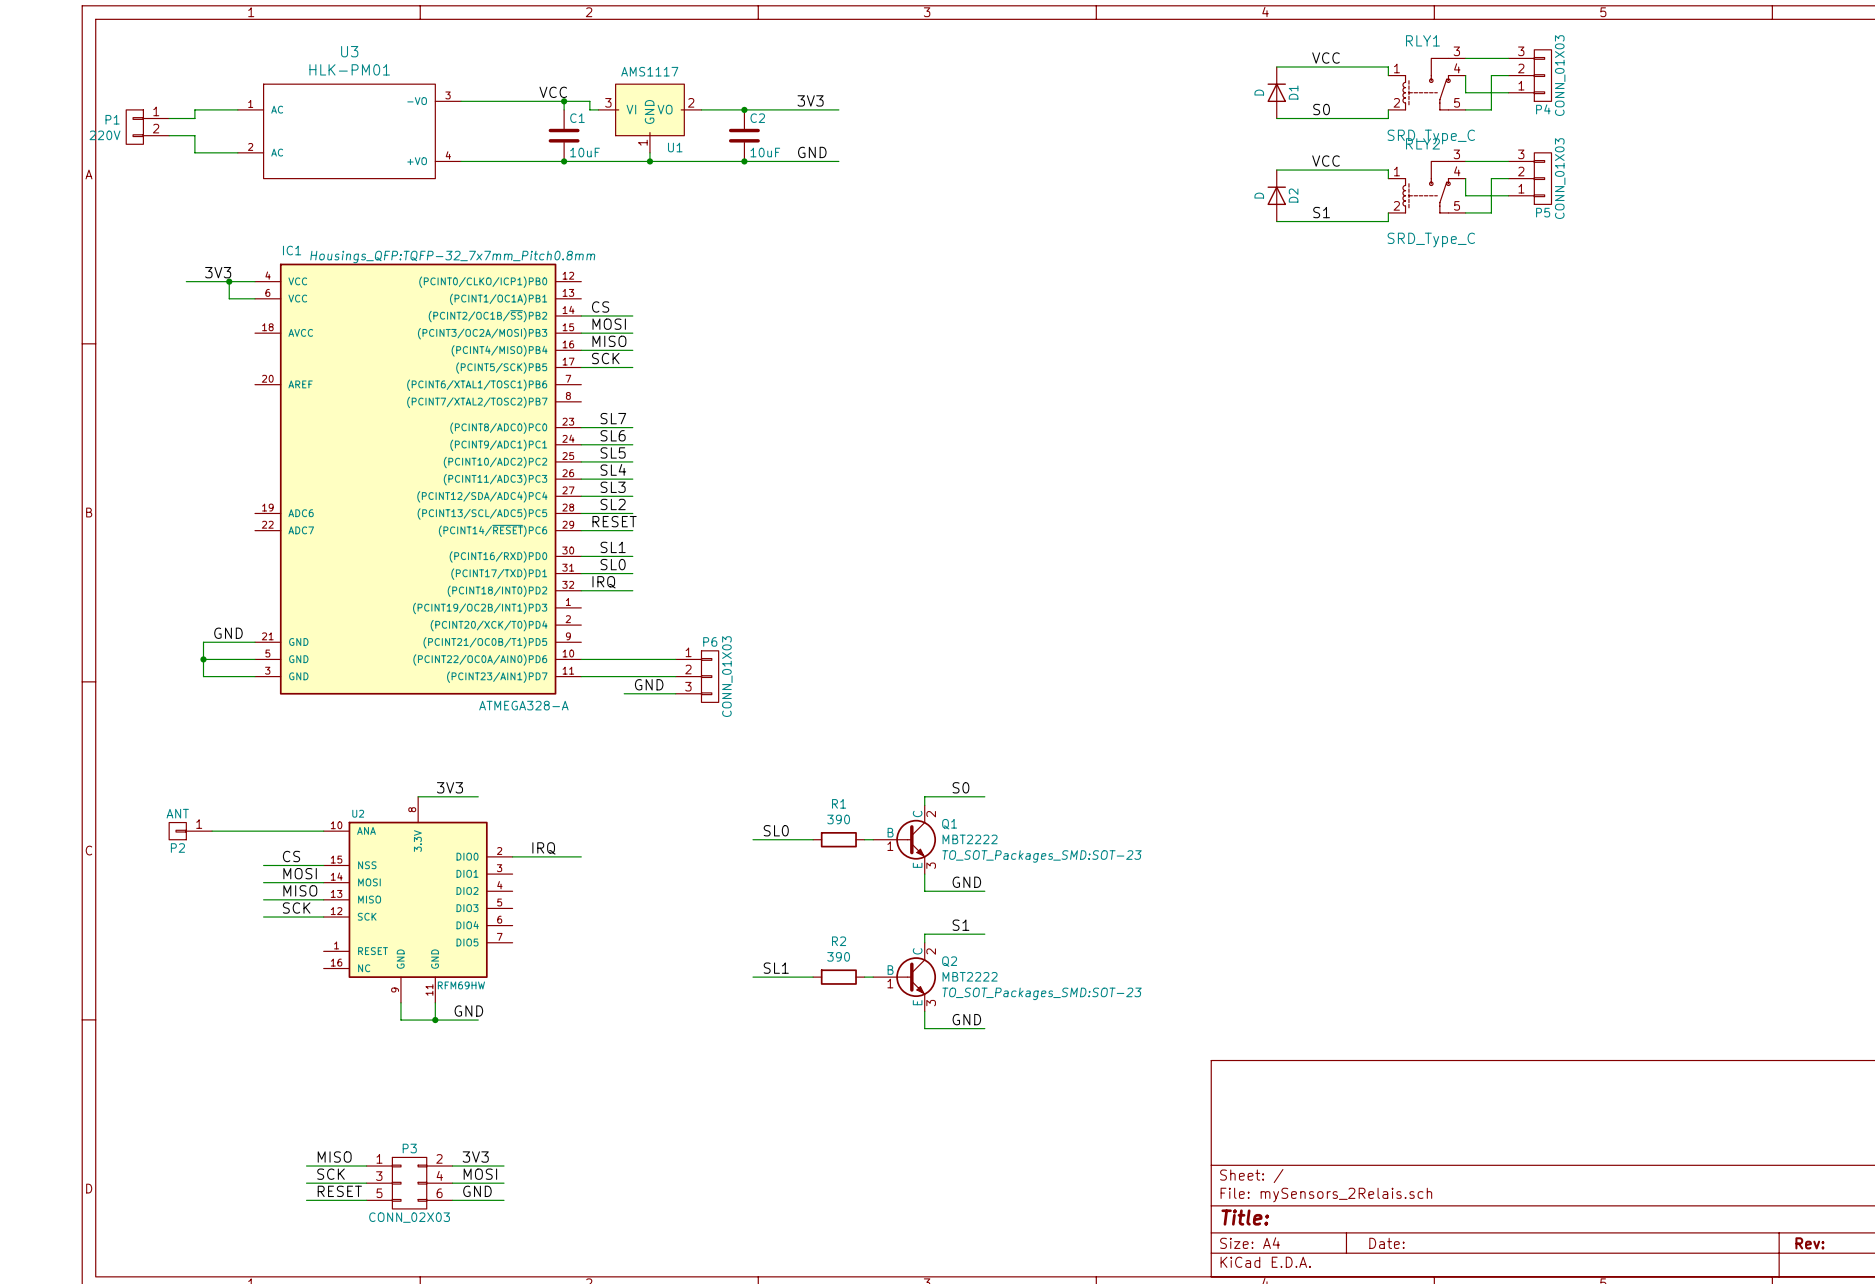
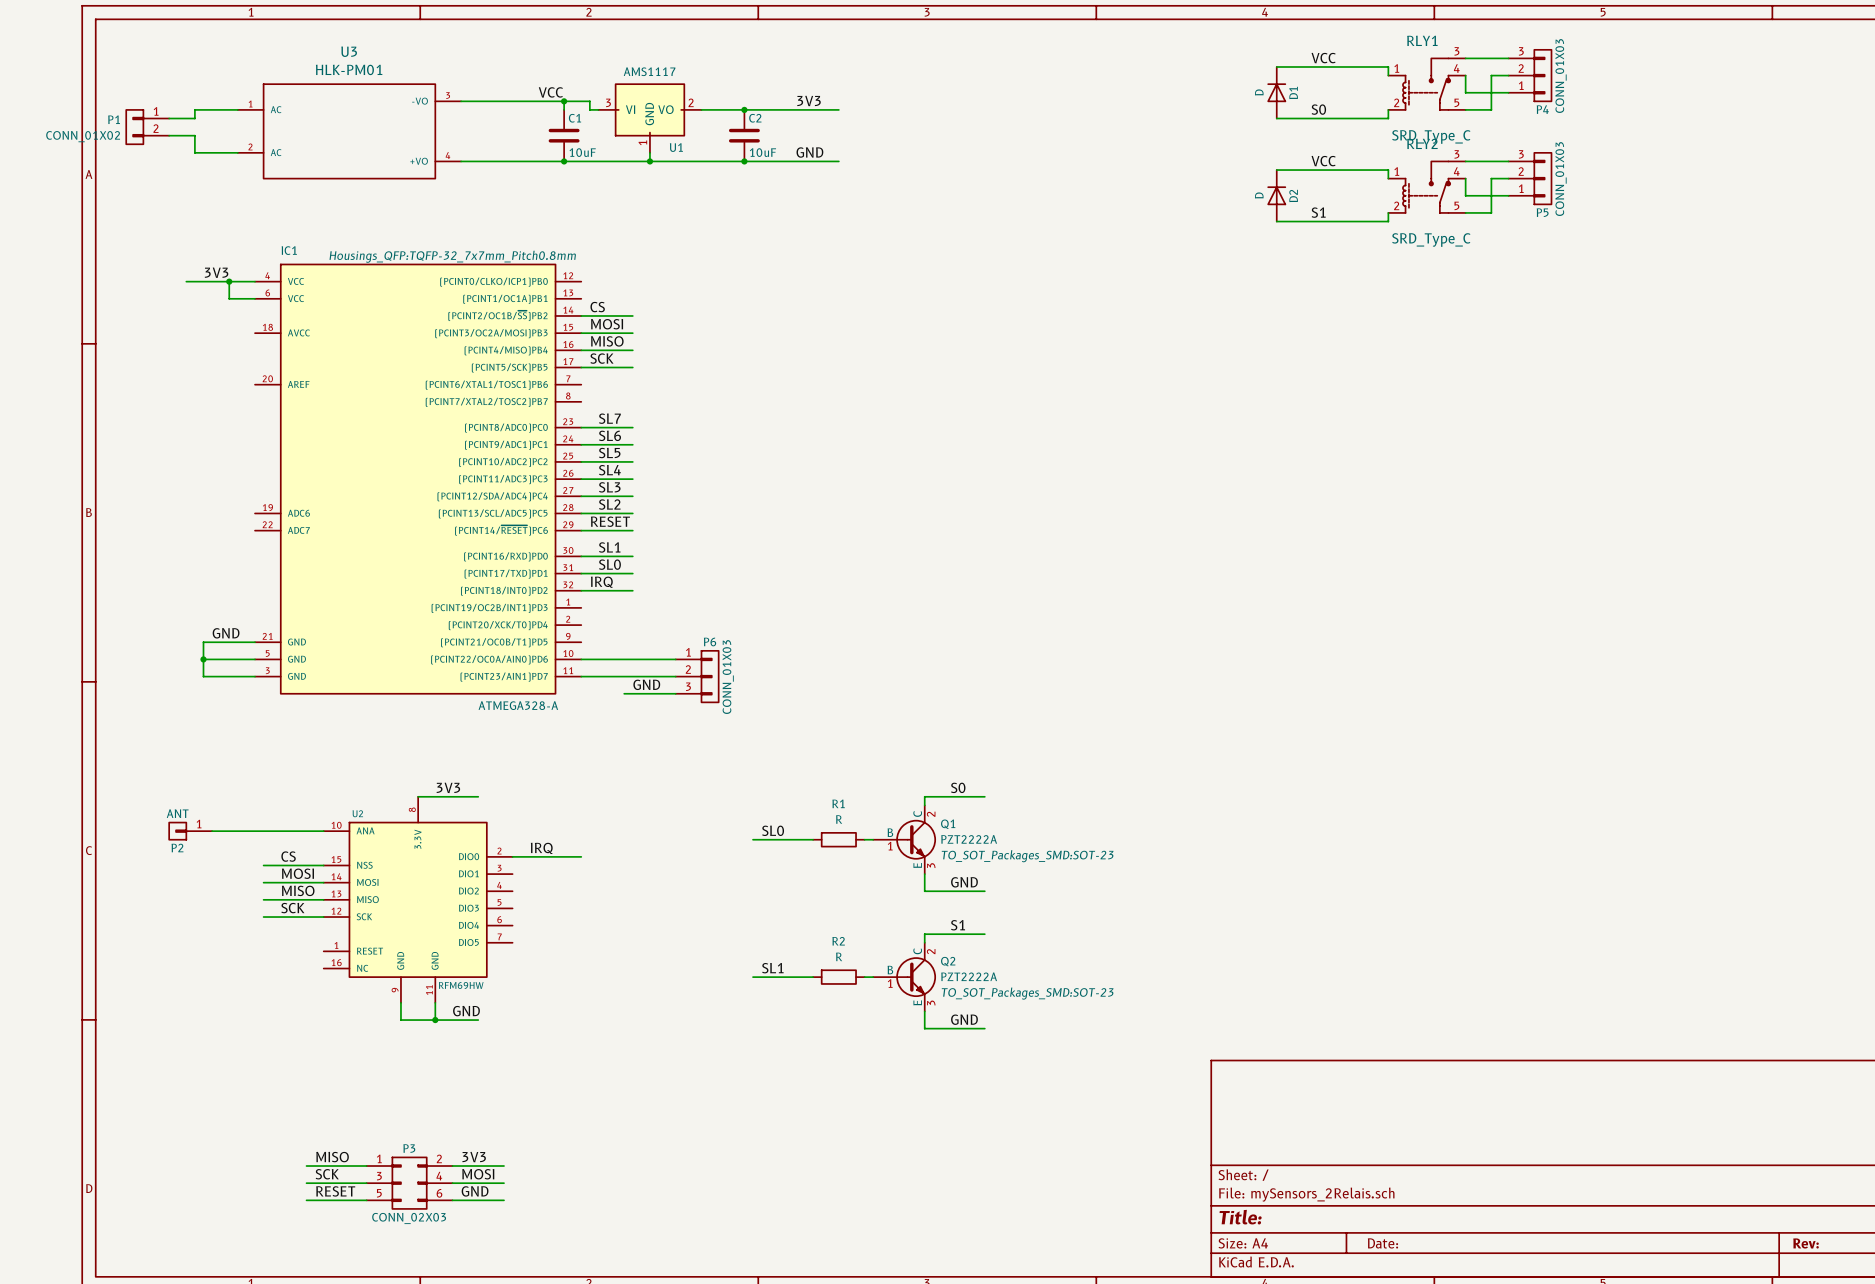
P1 value: 220V (104, 135) -> CONN_01X02 (83, 136)
R1 value: 390 (838, 819) -> R (839, 819)
Q1 value: MBT2222 (970, 839) -> PZT2222A (969, 839)
R2 value: 390 (838, 956) -> R (839, 956)
Q2 value: MBT2222 (970, 976) -> PZT2222A (969, 976)

